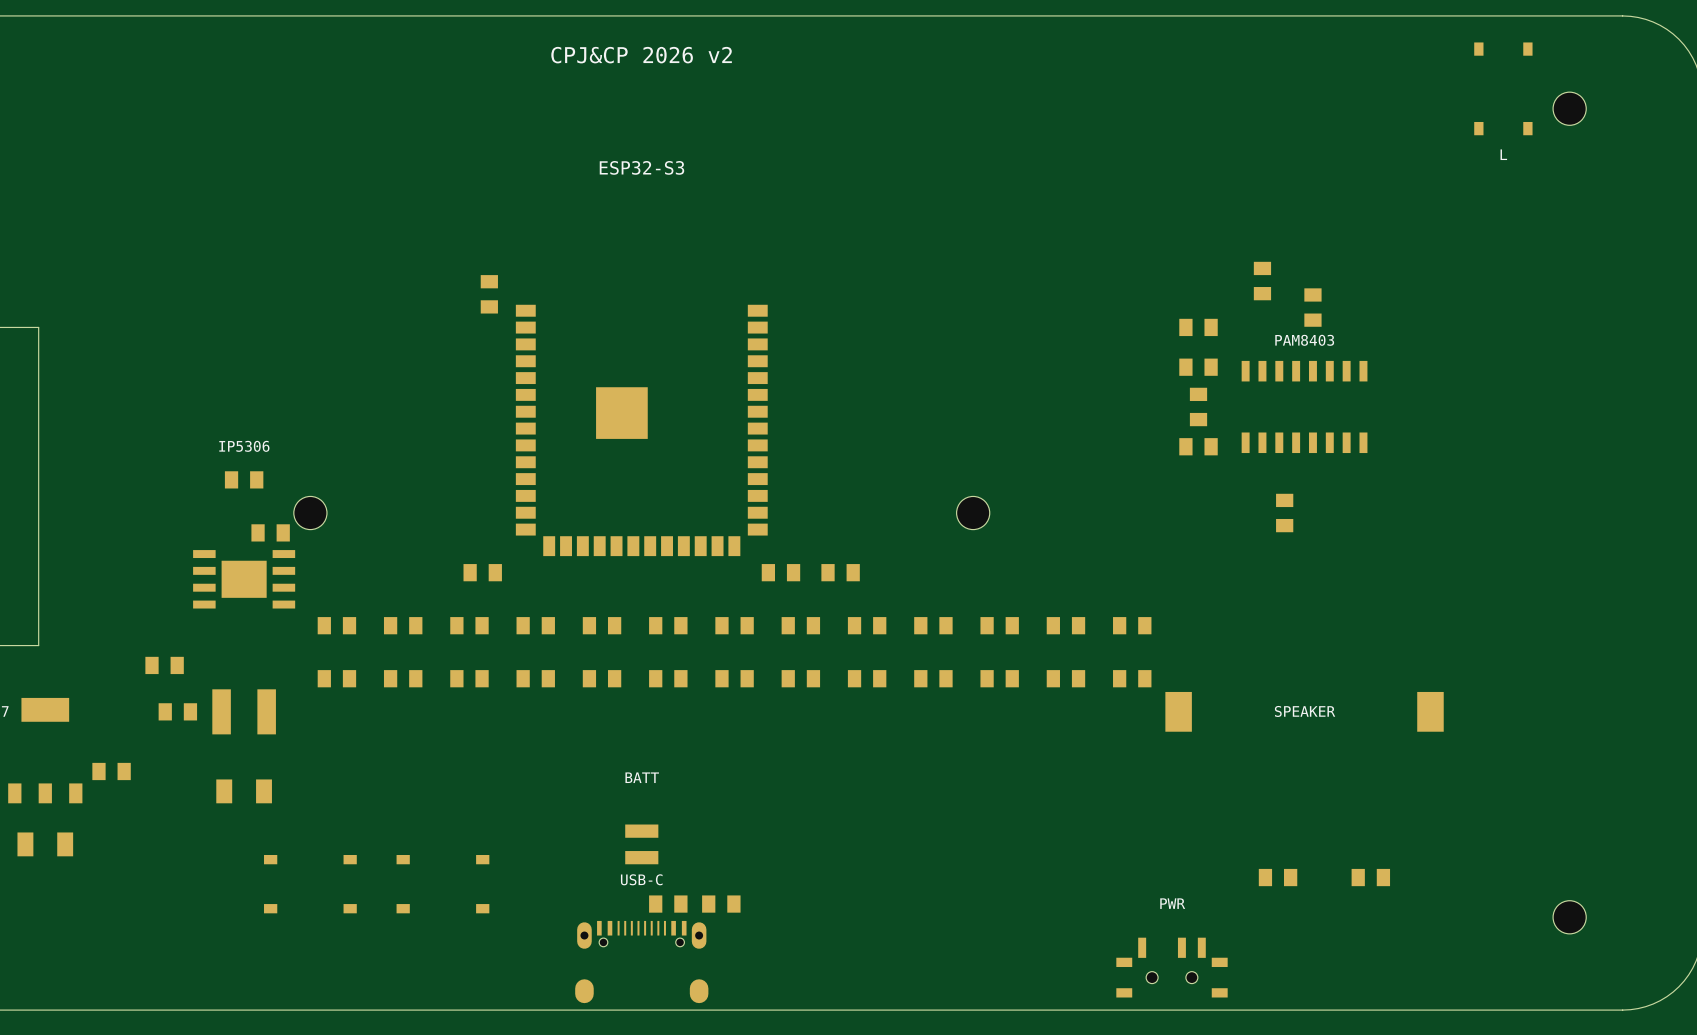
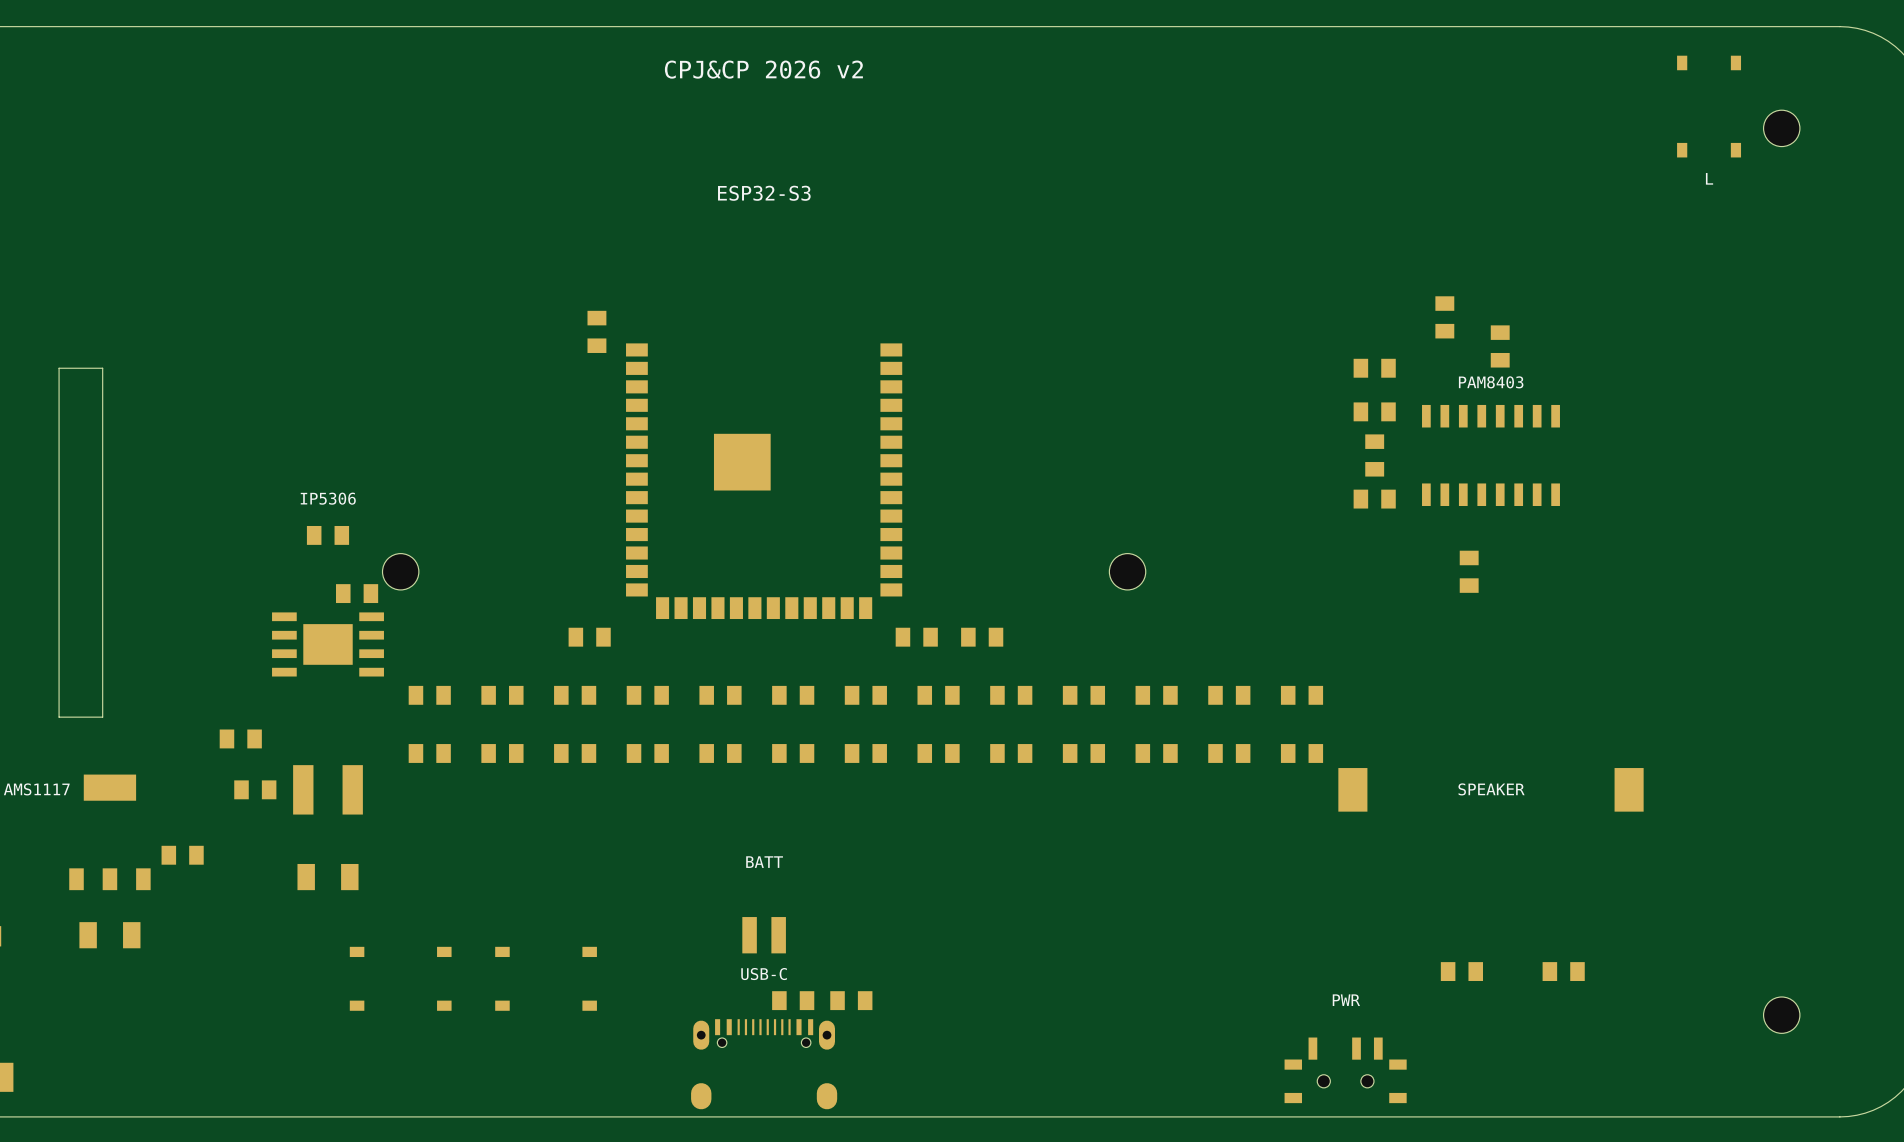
part rotation: 0° (641, 844) -> 90° clockwise (764, 935)

